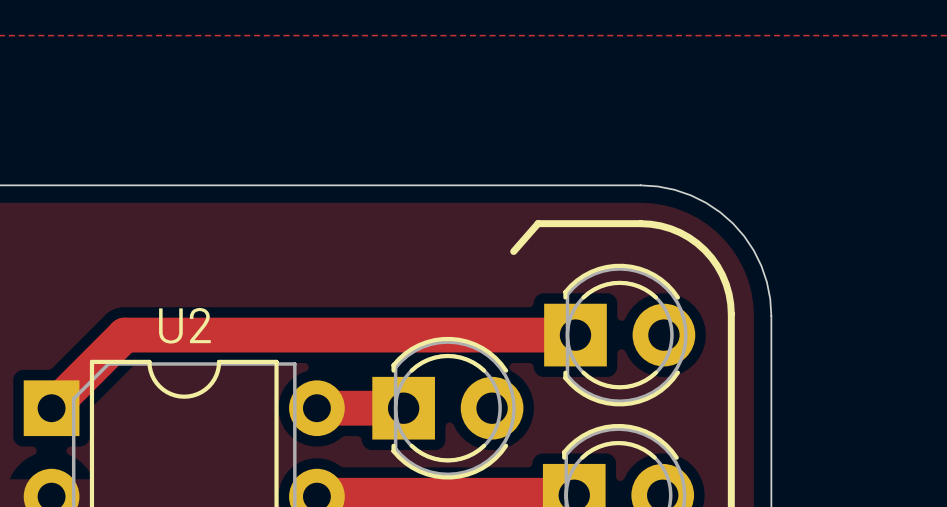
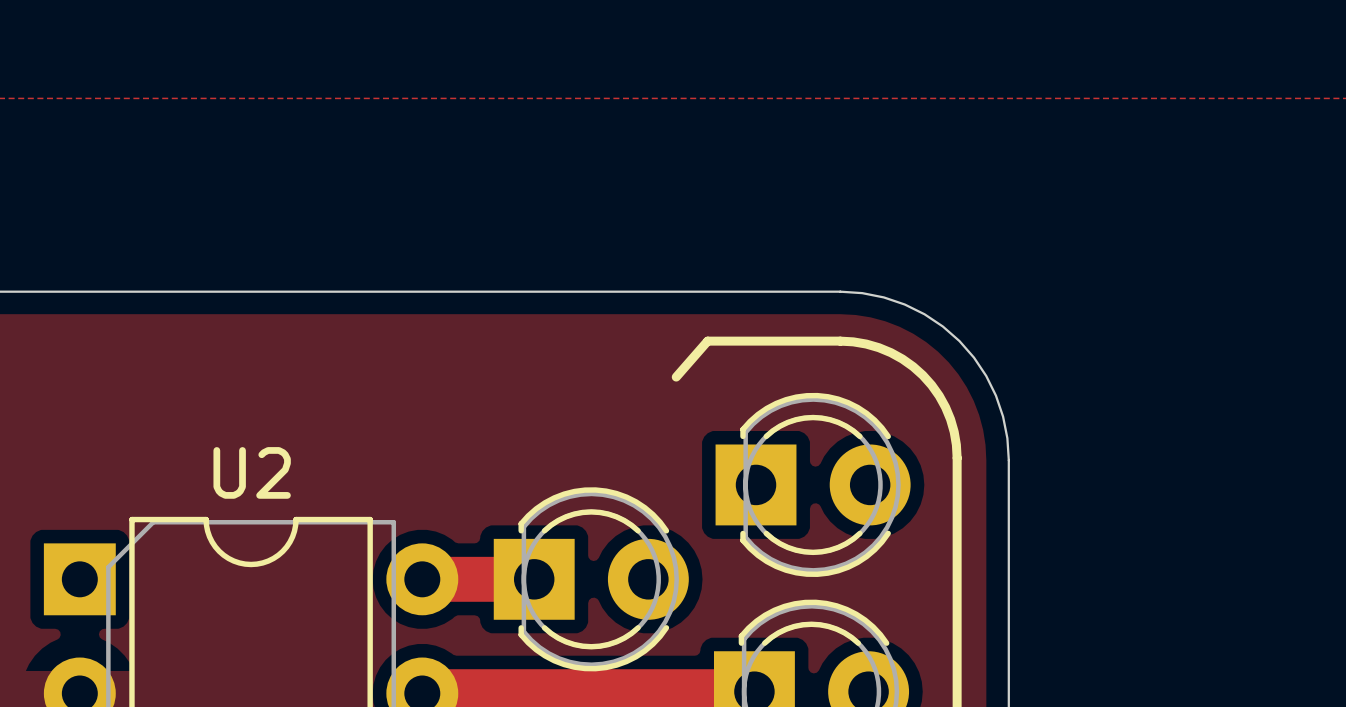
track: (575, 335) (124, 335) (51, 408) -> none

